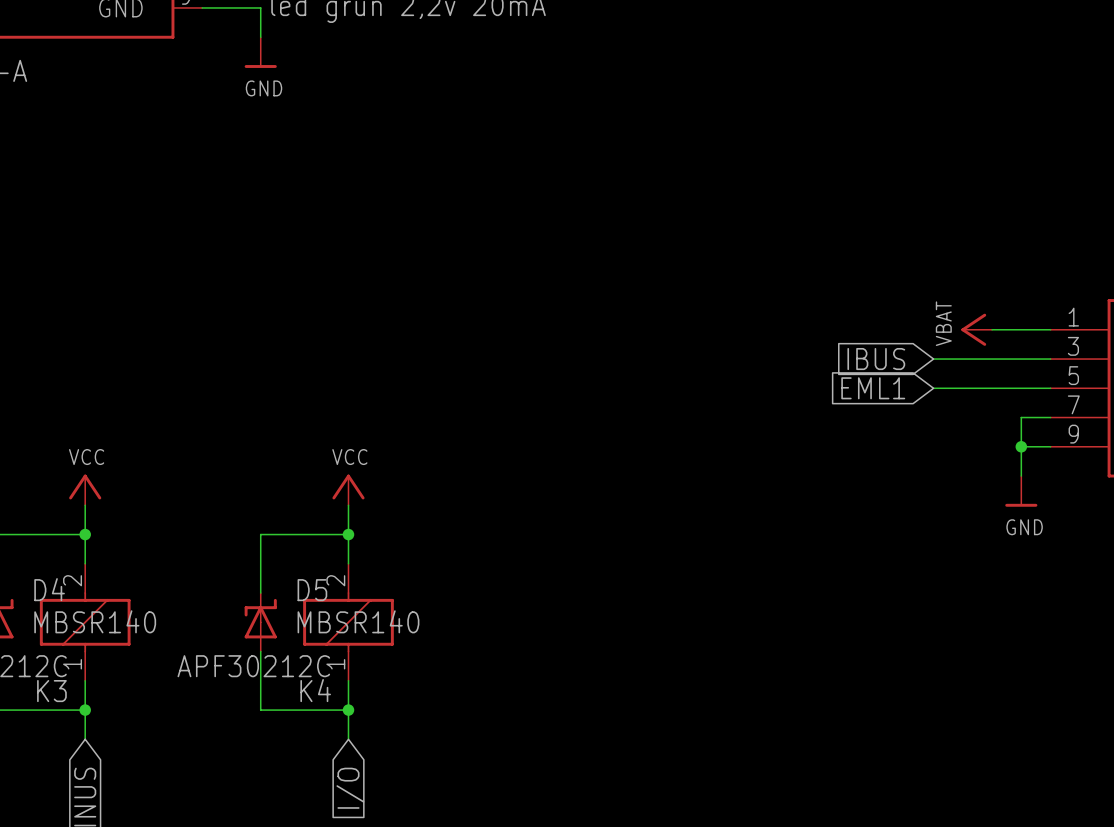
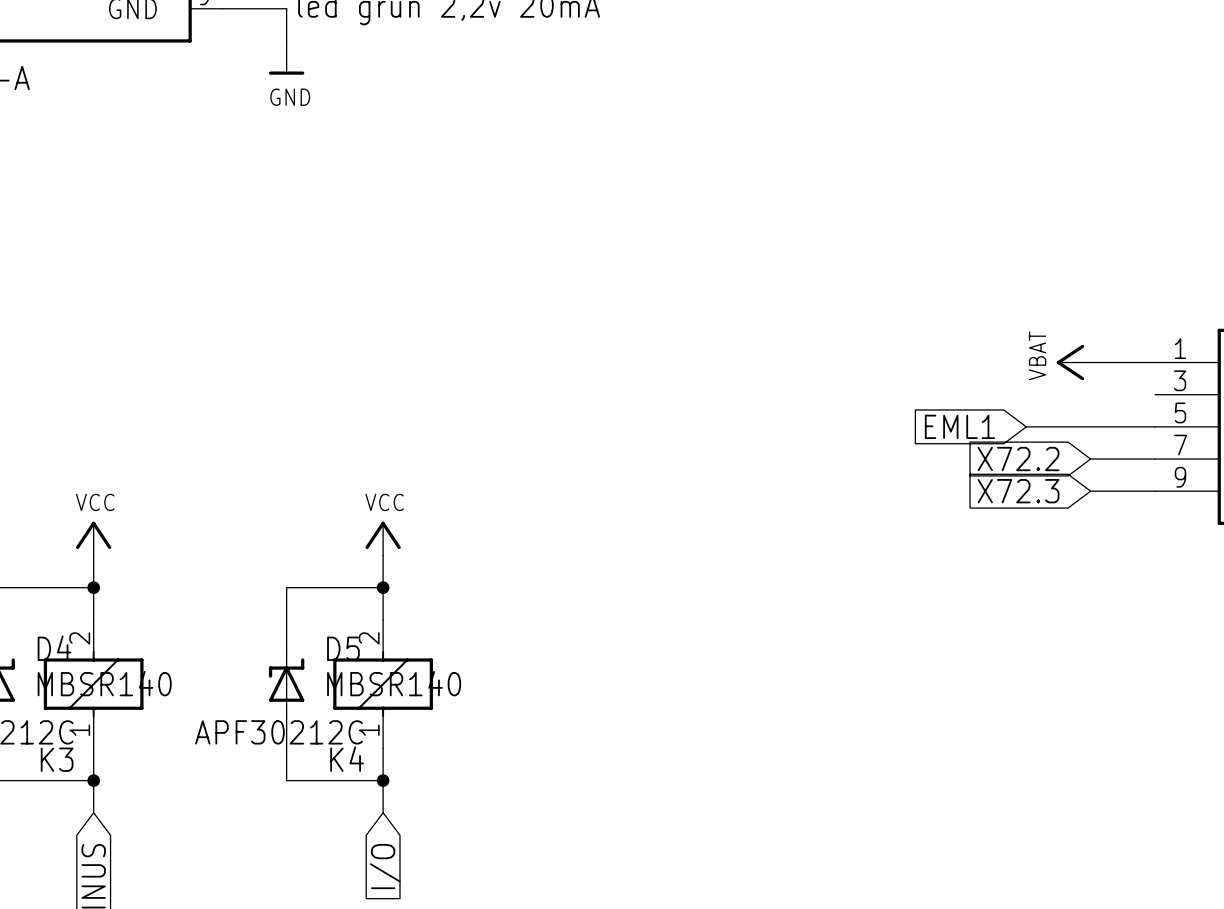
global label: IBUS (876, 359) -> none
wire: (933, 359) (1050, 359) -> none
global label: none -> X72.2 (1018, 459)
wire: (1021, 417) (1021, 476) -> (1122, 459) (1090, 459)
global label: none -> X72.3 (1018, 491)
wire: none -> (1090, 491) (1122, 491)
junction: (1021, 446) -> none
power symbol: GND (1021, 491) -> none

